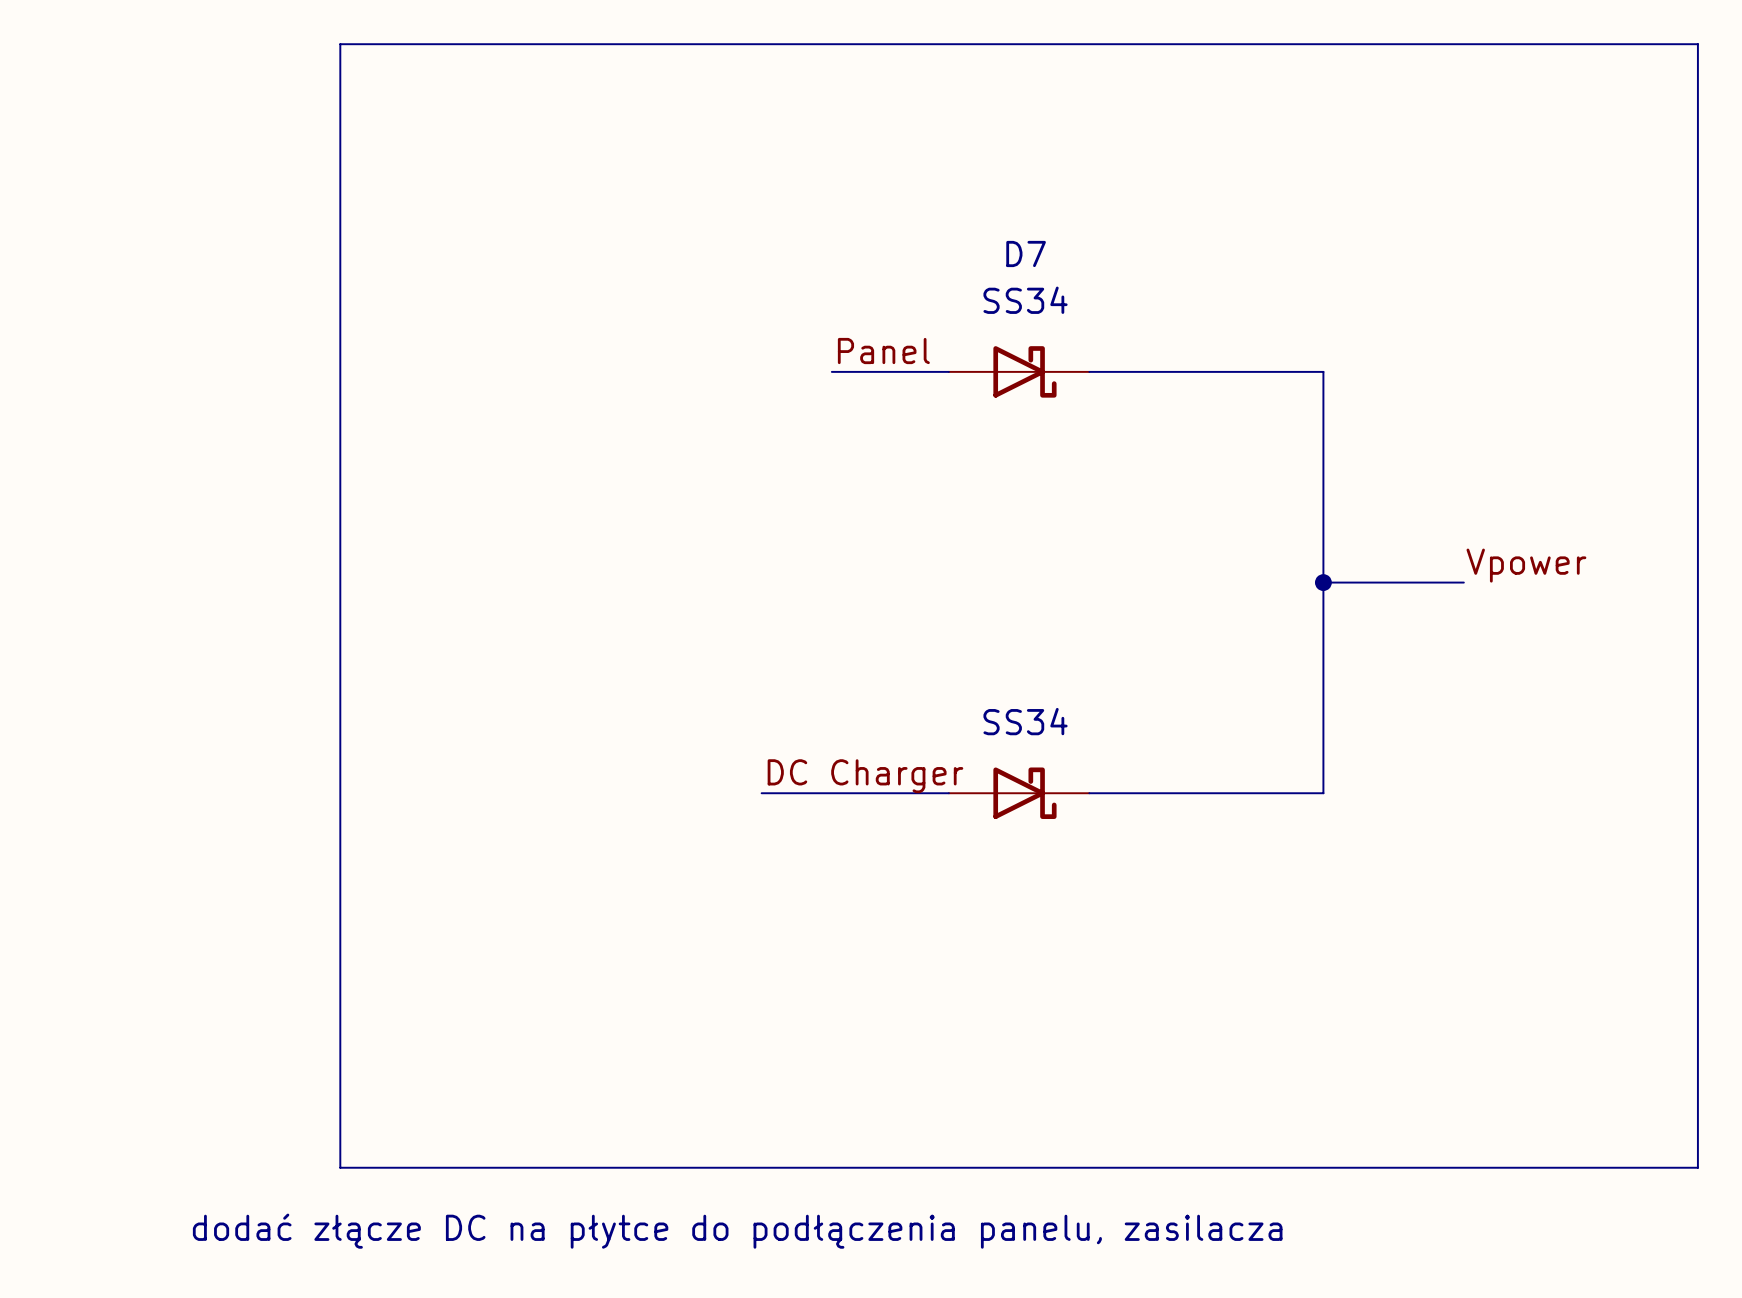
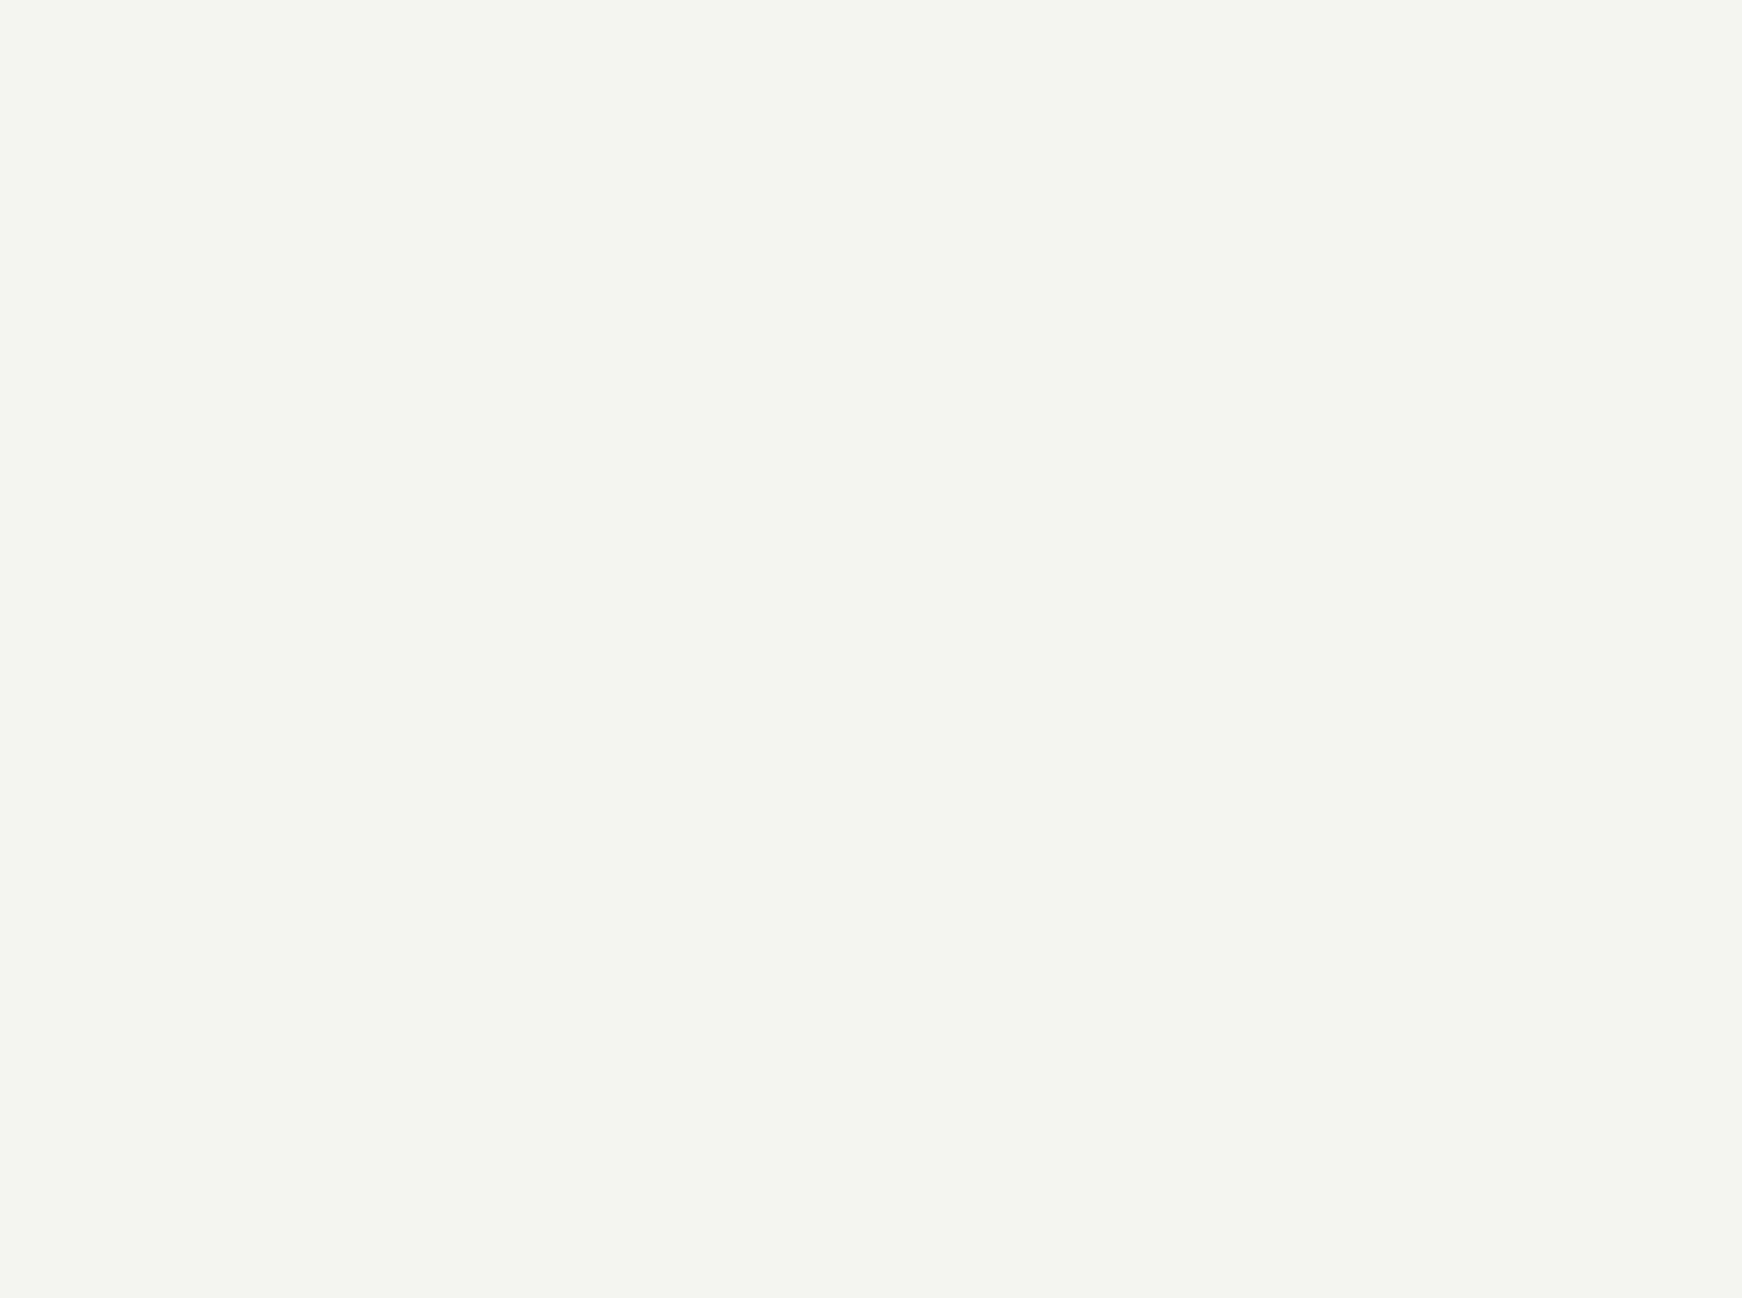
line: (340, 44) (1697, 44) (1697, 1167) (340, 1167) (340, 44) -> none
label: Panel (883, 351) -> none
wire: (831, 371) (948, 371) -> none
D7: SS34 (1019, 371) -> none
wire: (1089, 371) (1323, 371) (1323, 793) (1089, 793) -> none
label: Vpower (1526, 565) -> none
wire: (1323, 582) (1463, 582) -> none
junction: (1323, 582) -> none
label: DC Charger (865, 776) -> none
wire: (761, 793) (948, 793) -> none
part: SS34 (1019, 793) -> none
text: dodać złącze DC na płytce do podłączenia panelu, zasilacza (737, 1231) -> none

